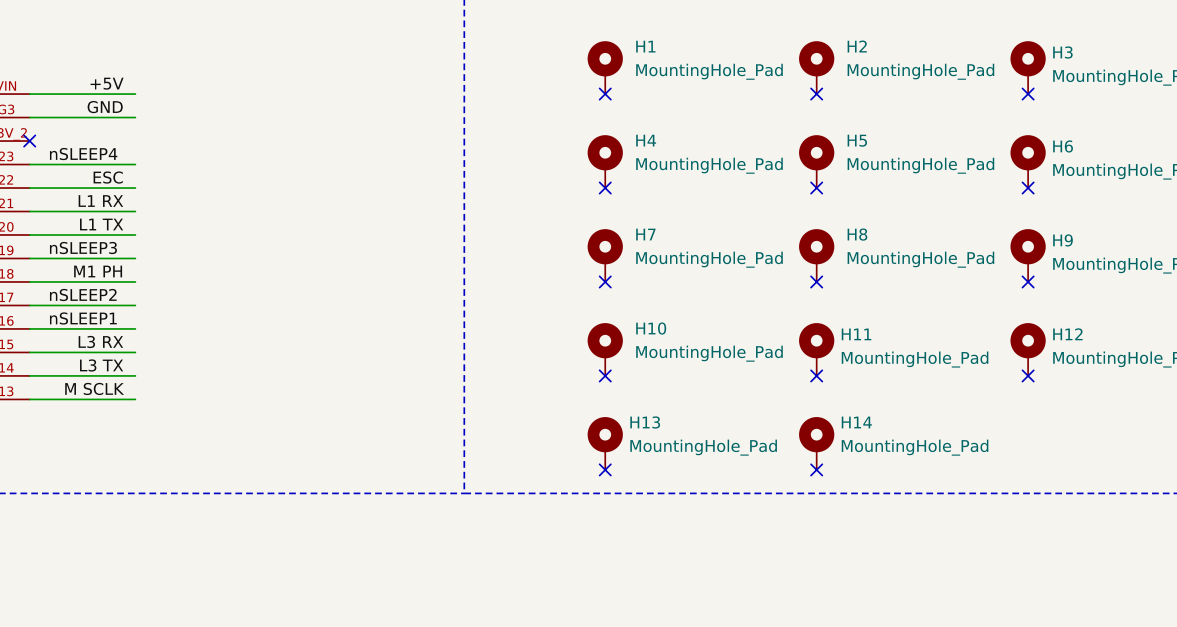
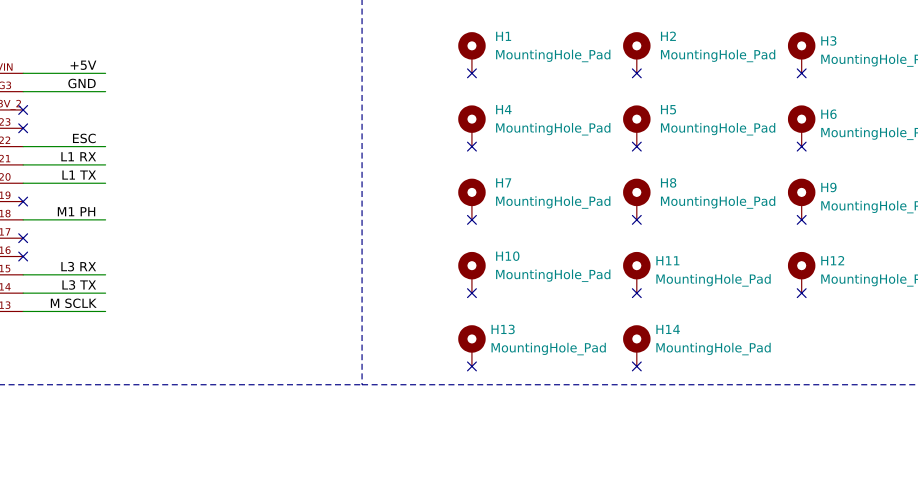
label: nSLEEP4 (83, 154) -> none
wire: (29, 164) (135, 164) -> none
no-connect mark: none -> (23, 128)
label: nSLEEP3 (83, 248) -> none
wire: (29, 258) (135, 258) -> none
no-connect mark: none -> (23, 201)
label: nSLEEP2 (83, 295) -> none
wire: (29, 305) (135, 305) -> none
no-connect mark: none -> (23, 238)
label: nSLEEP1 (83, 318) -> none
wire: (29, 328) (135, 328) -> none
no-connect mark: none -> (23, 256)

